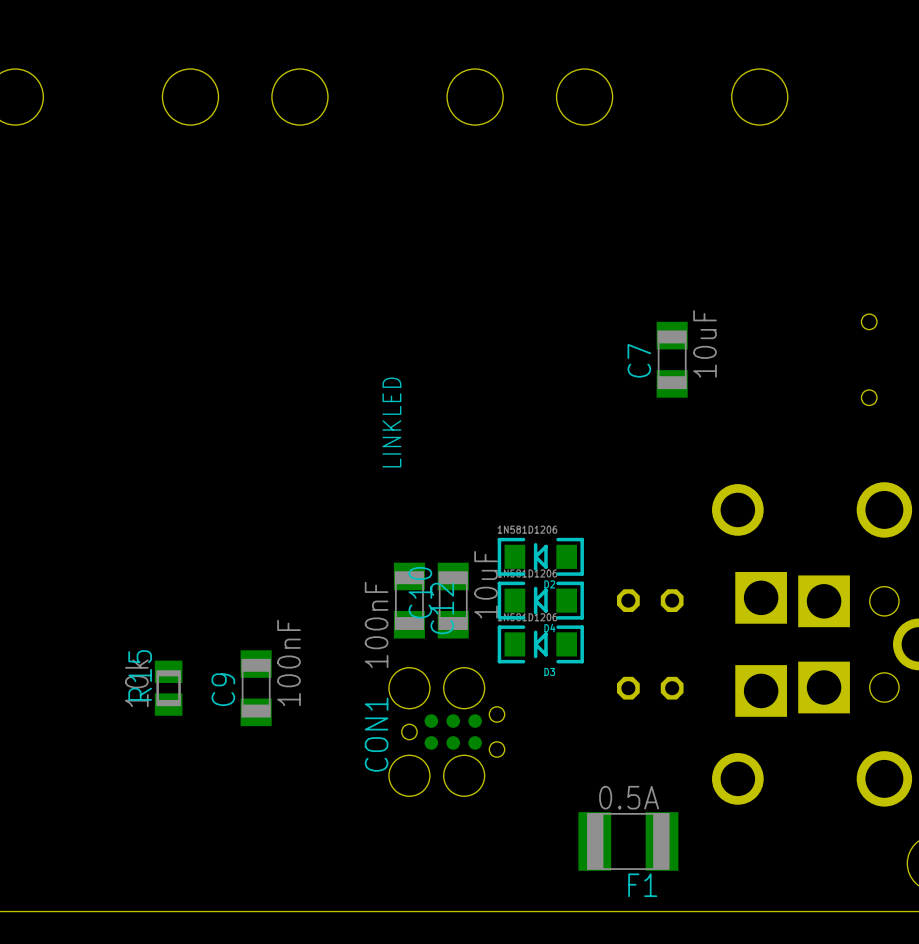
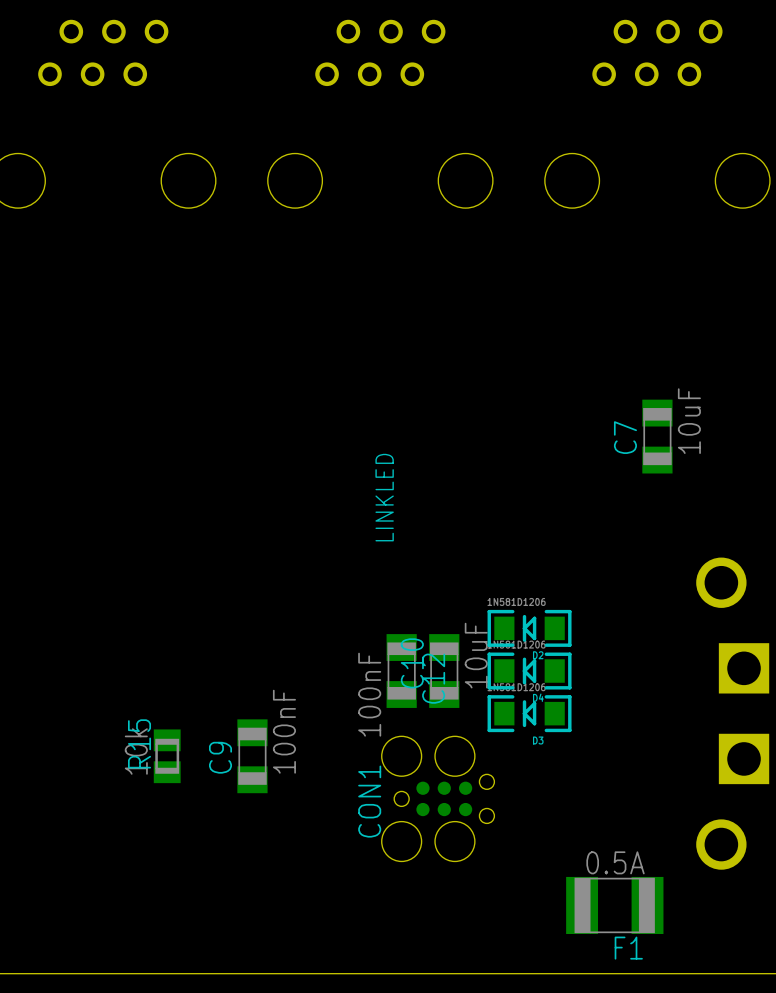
part: (650, 600) -> none
part: (650, 688) -> none

